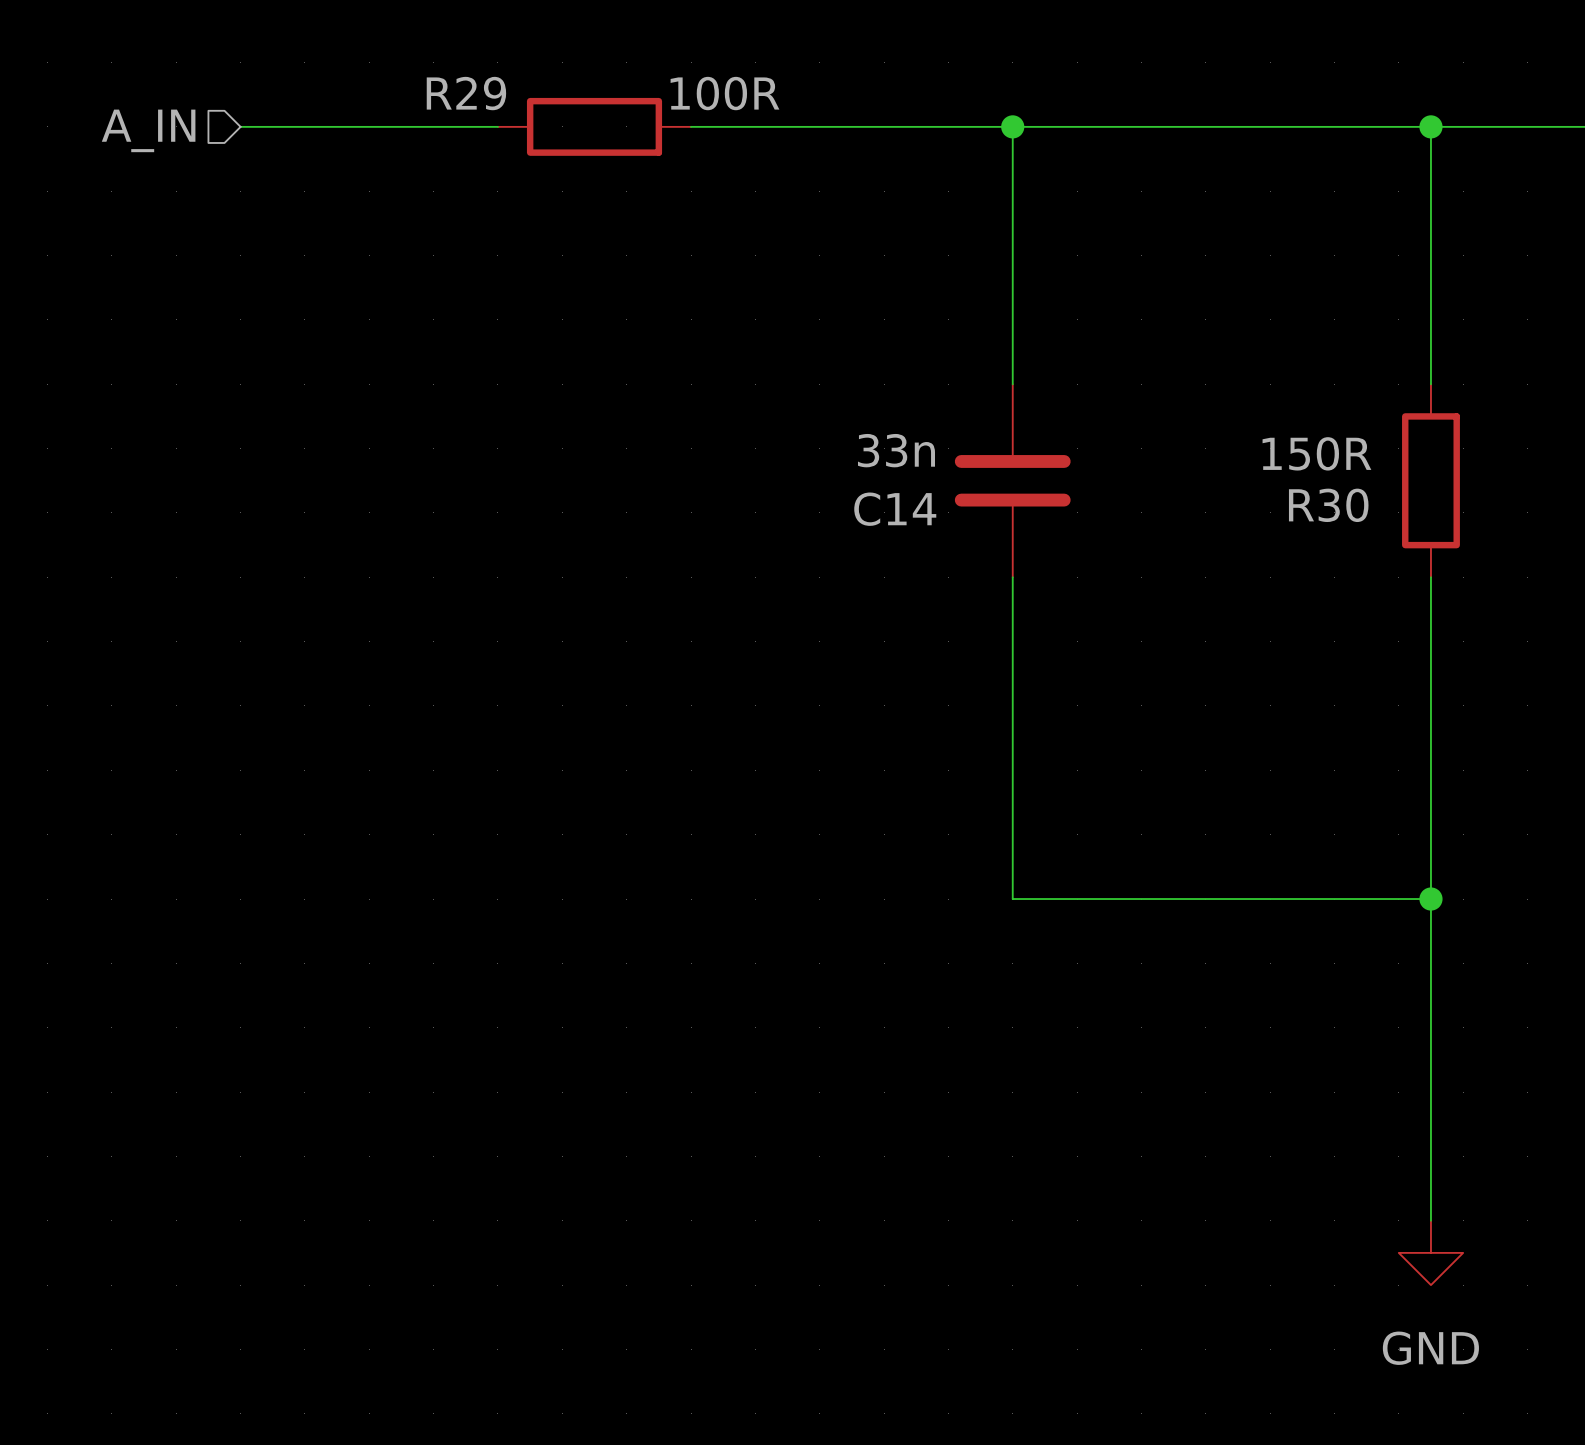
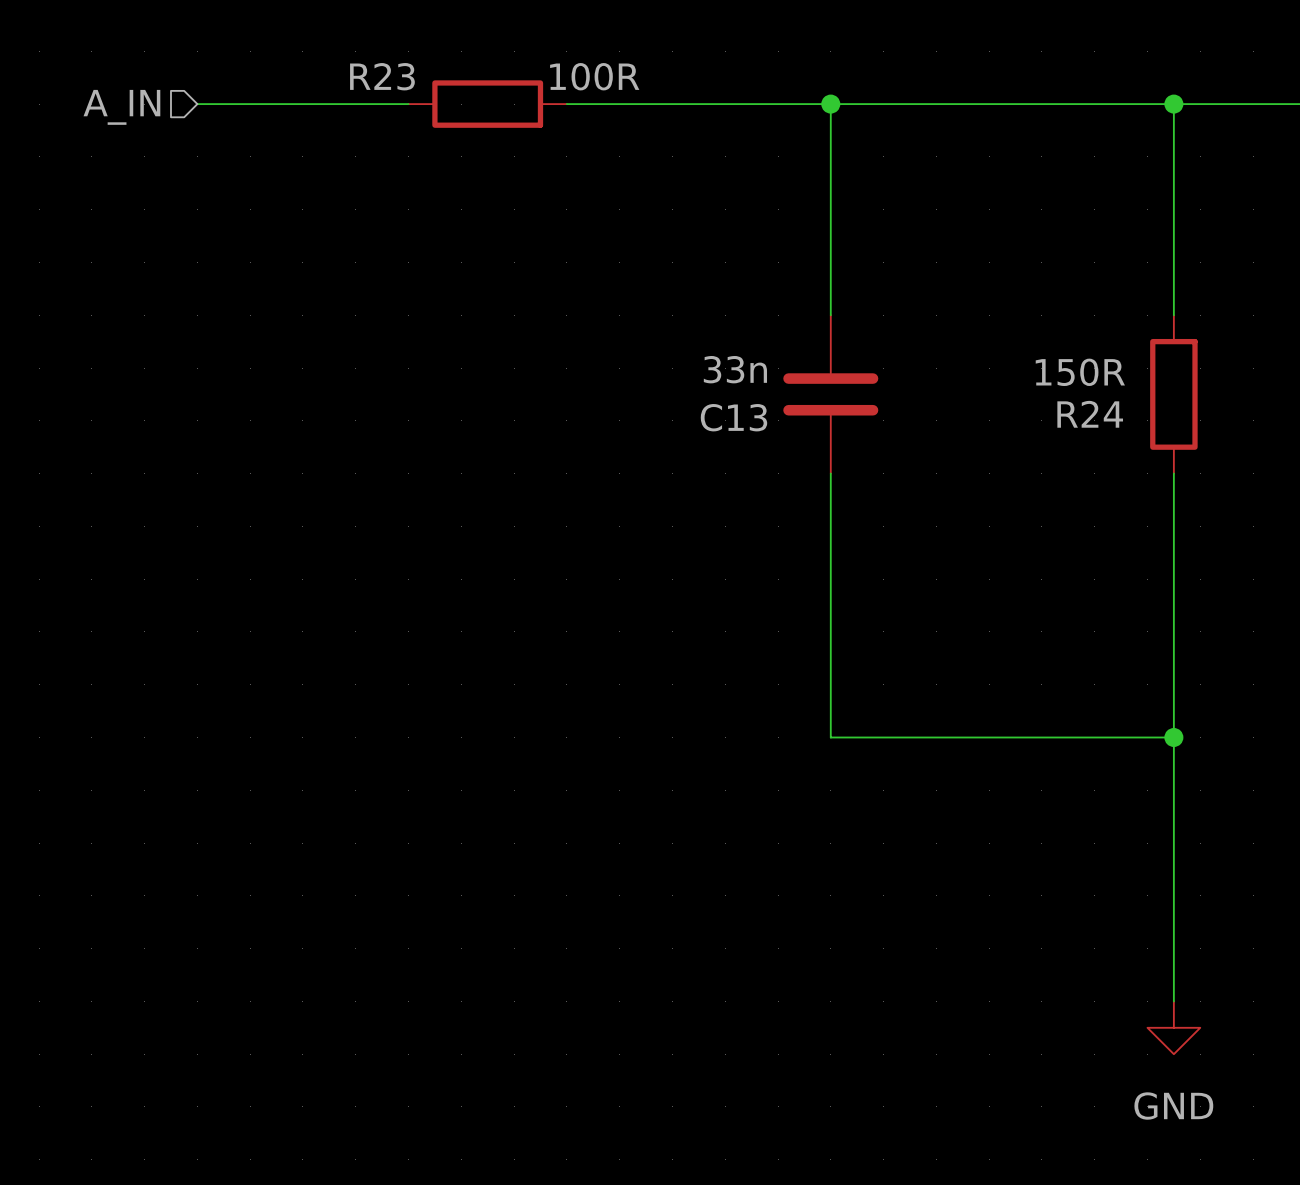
R29 name: R29 (466, 93) -> R23 (382, 76)
R30 name: R30 (1328, 505) -> R24 (1090, 414)
C14 name: C14 (895, 509) -> C13 (733, 417)

